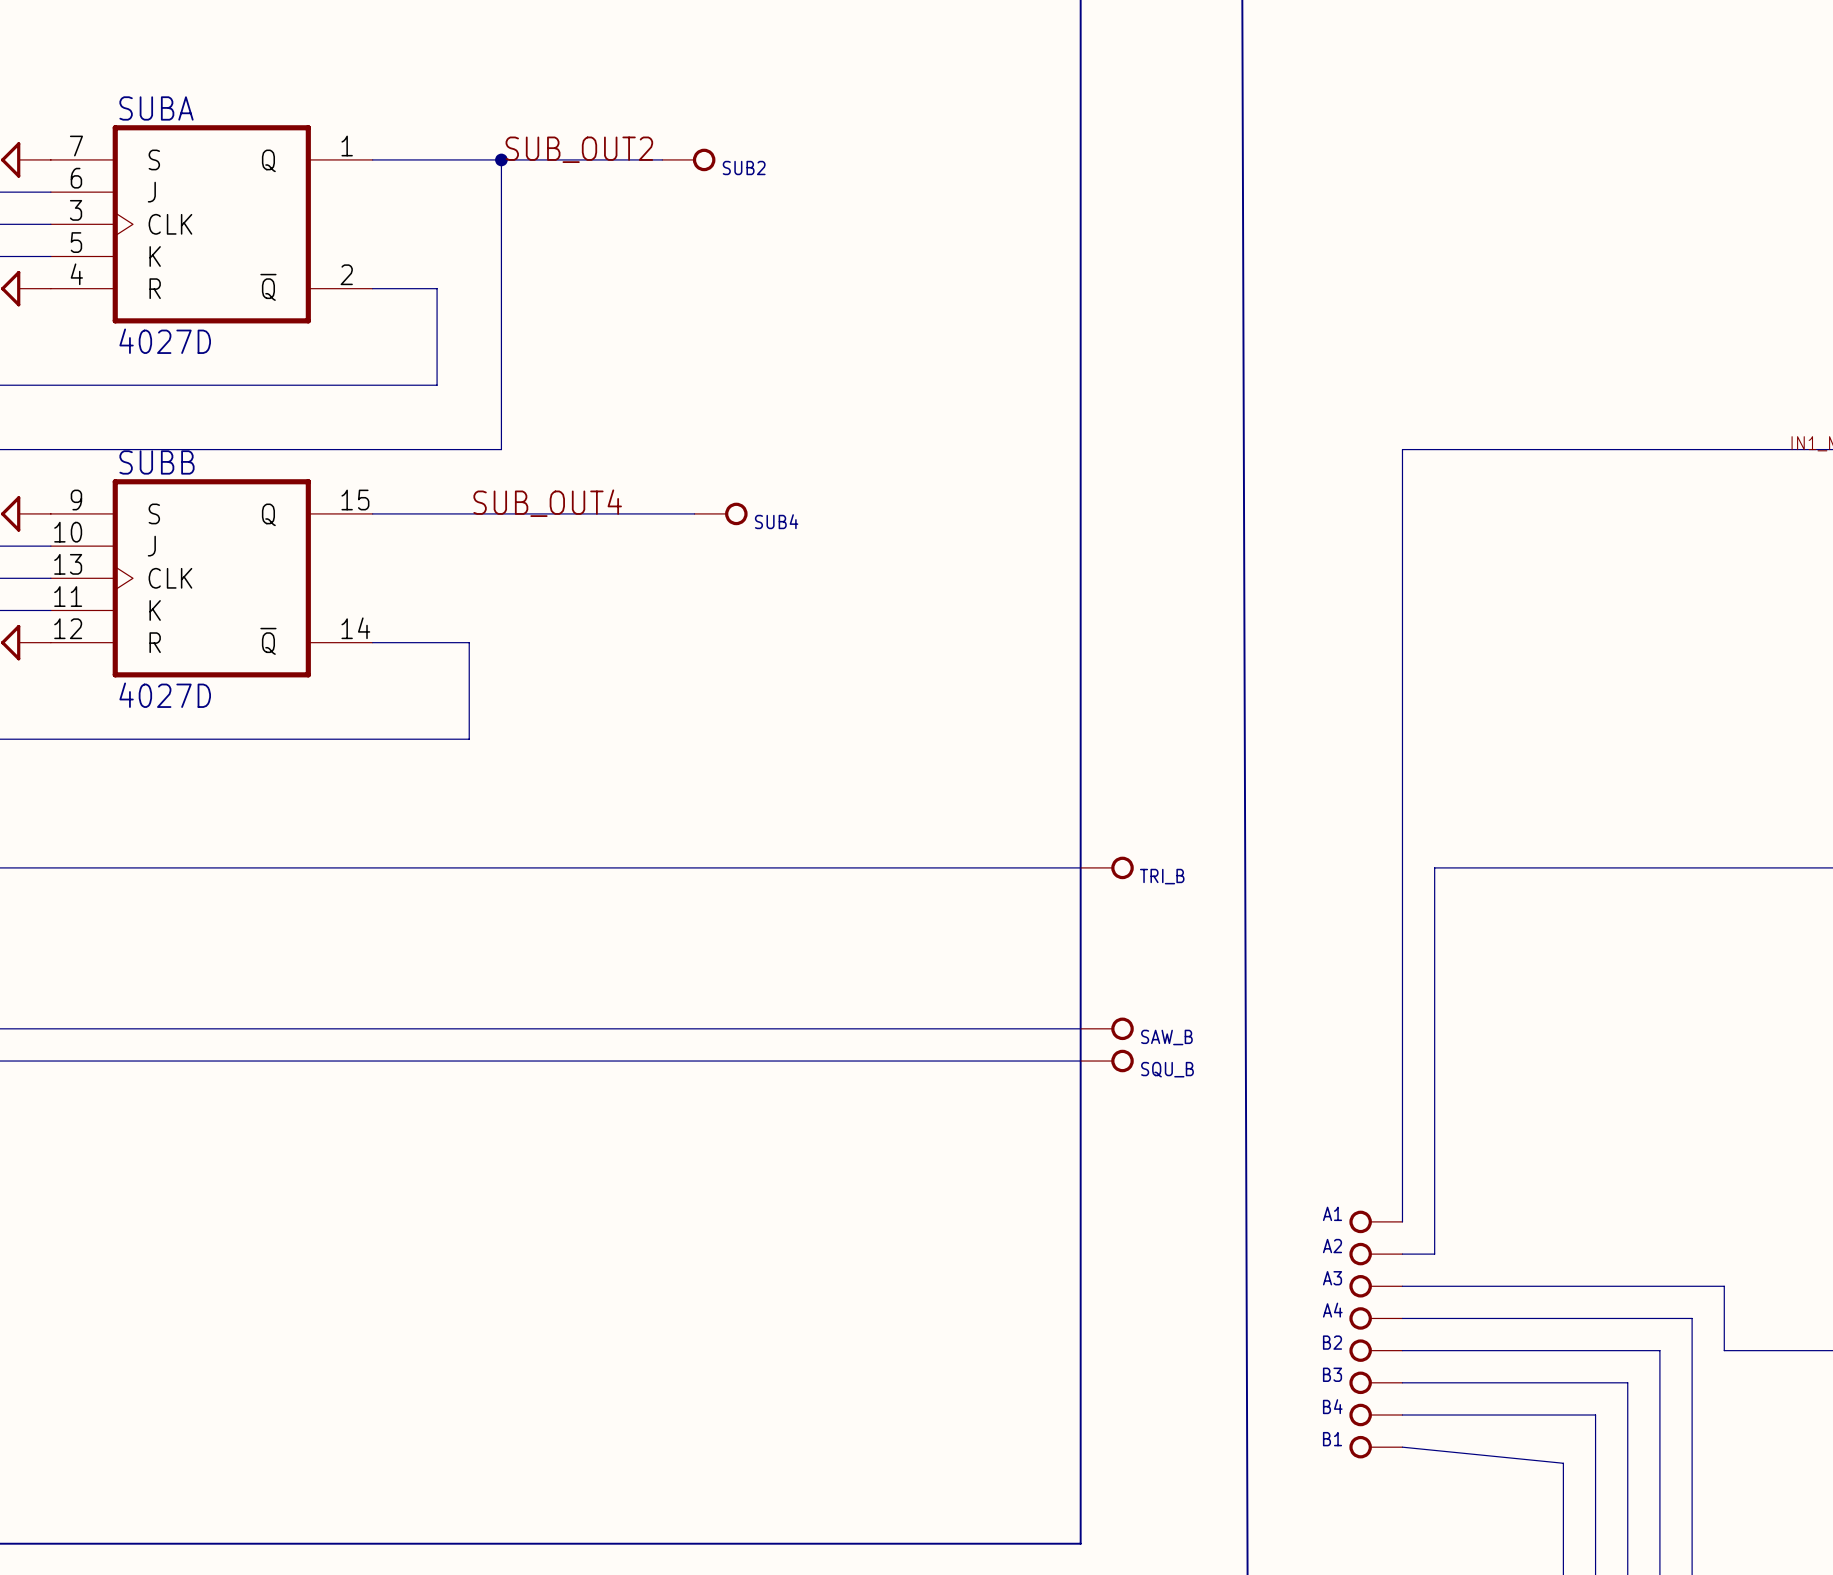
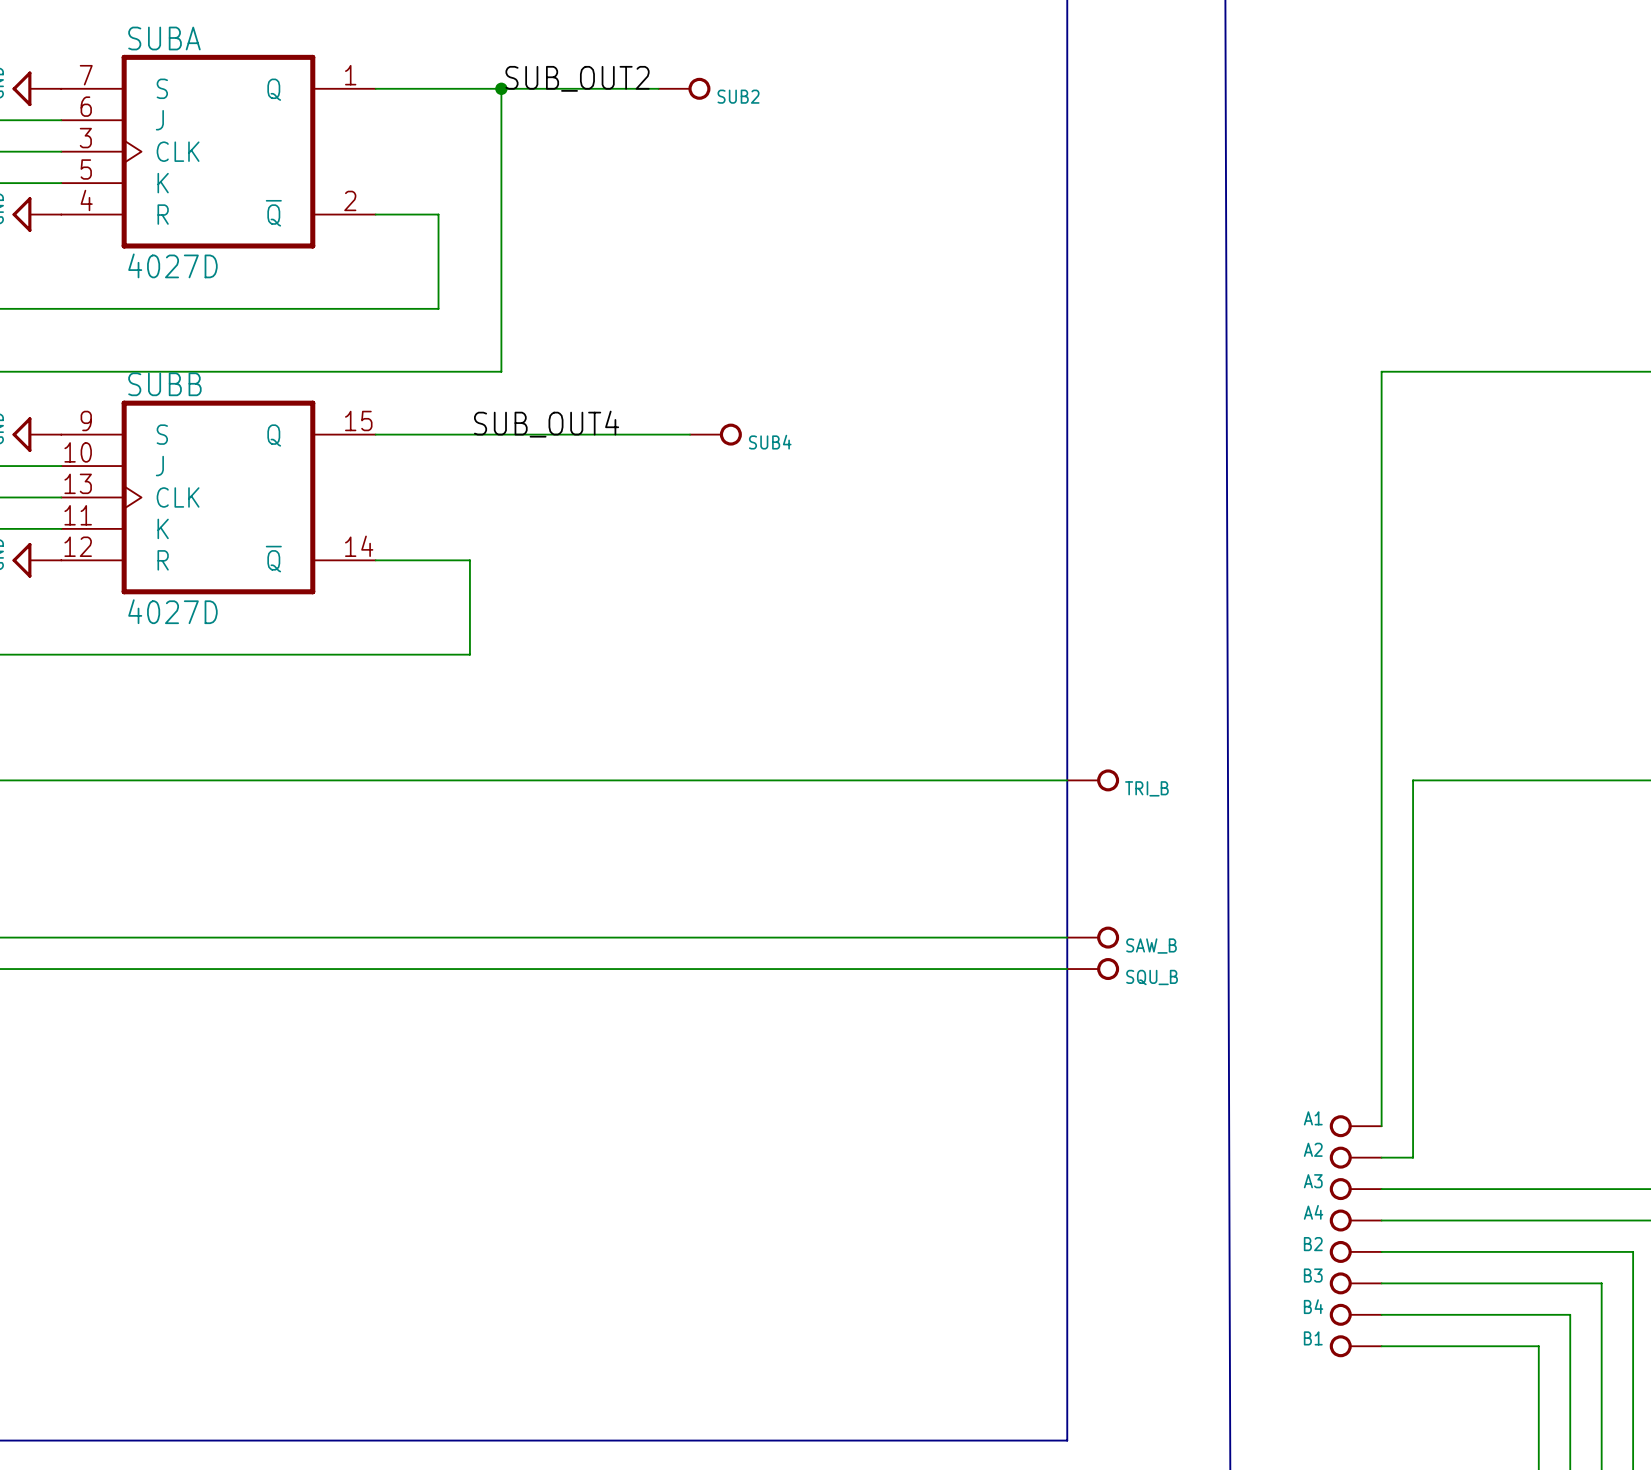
wire: (1402, 1447) (1563, 1463) -> (1381, 1346) (1538, 1346) (1538, 1361)

